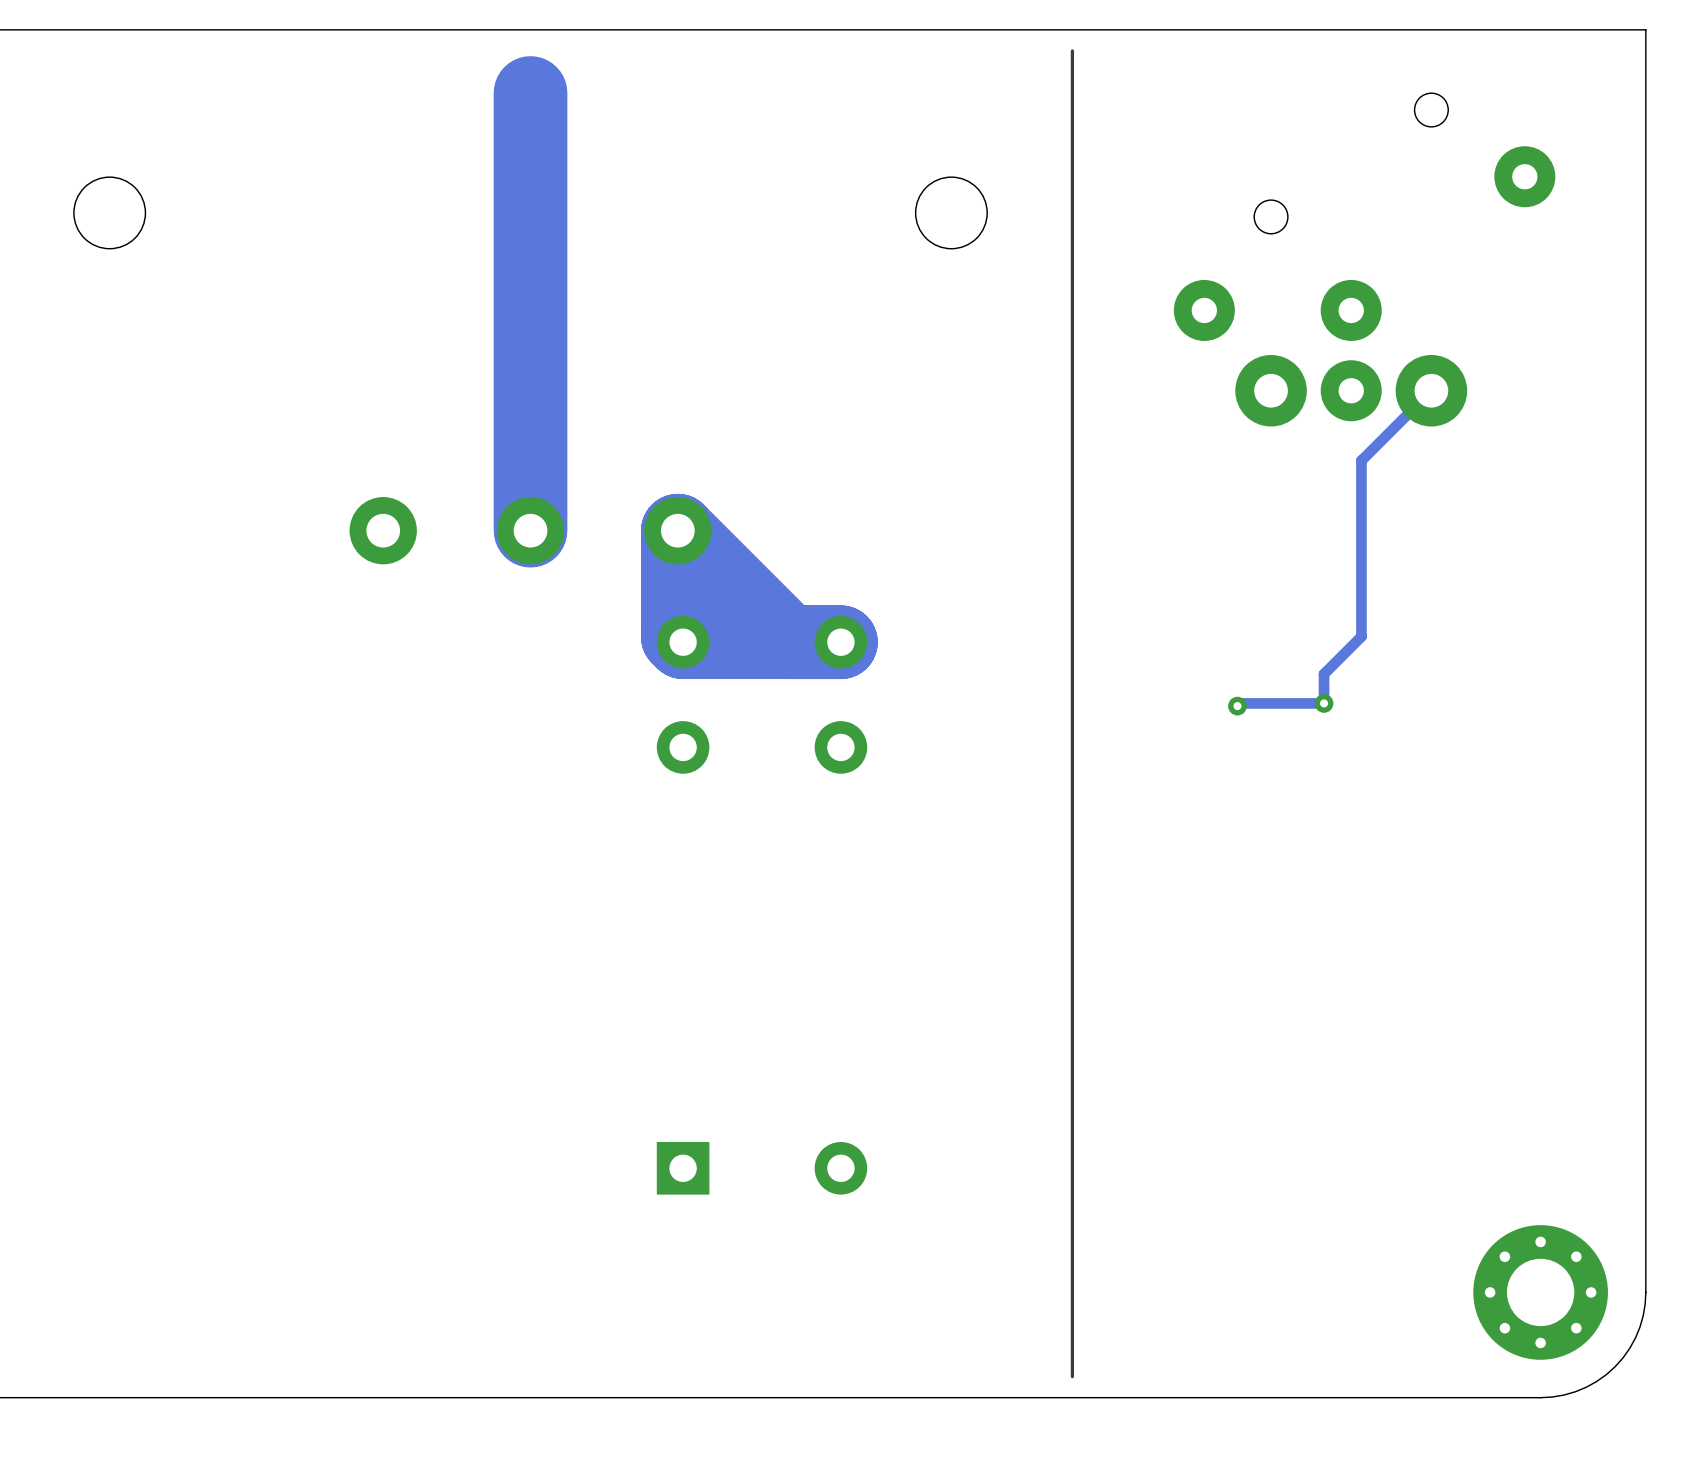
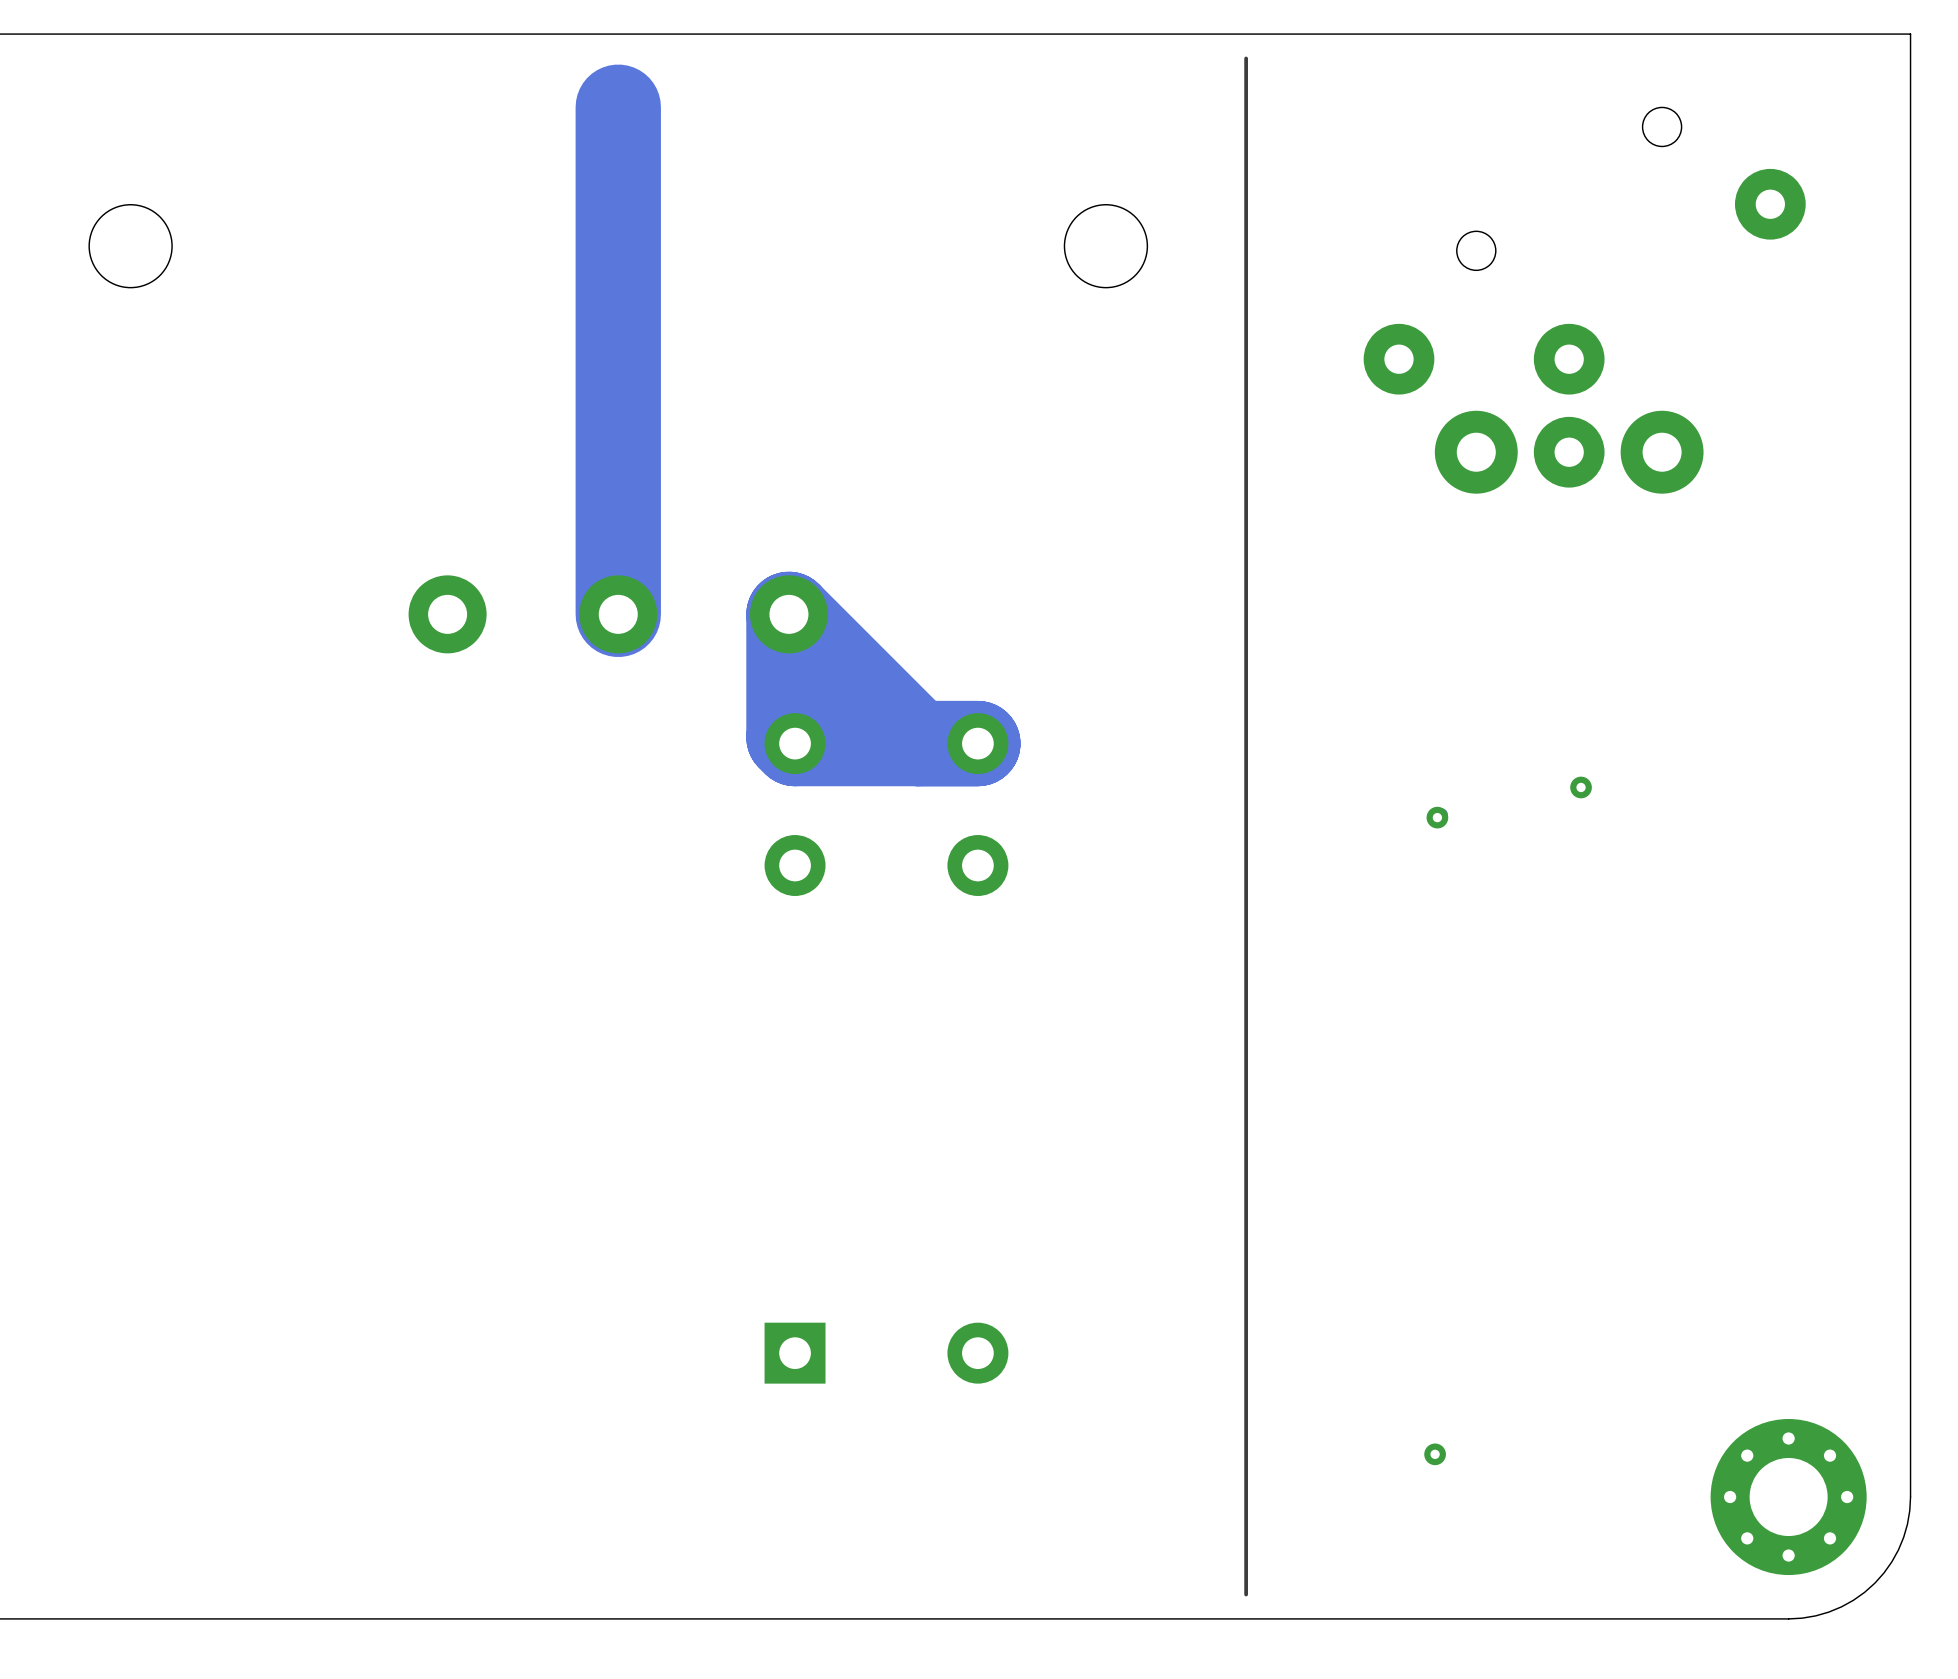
track: (1431, 390) (1361, 460) (1361, 636) (1324, 674) (1324, 703) (1241, 703) -> none
via position: (1324, 703) -> (1581, 787)
via: none -> (1435, 1454)

